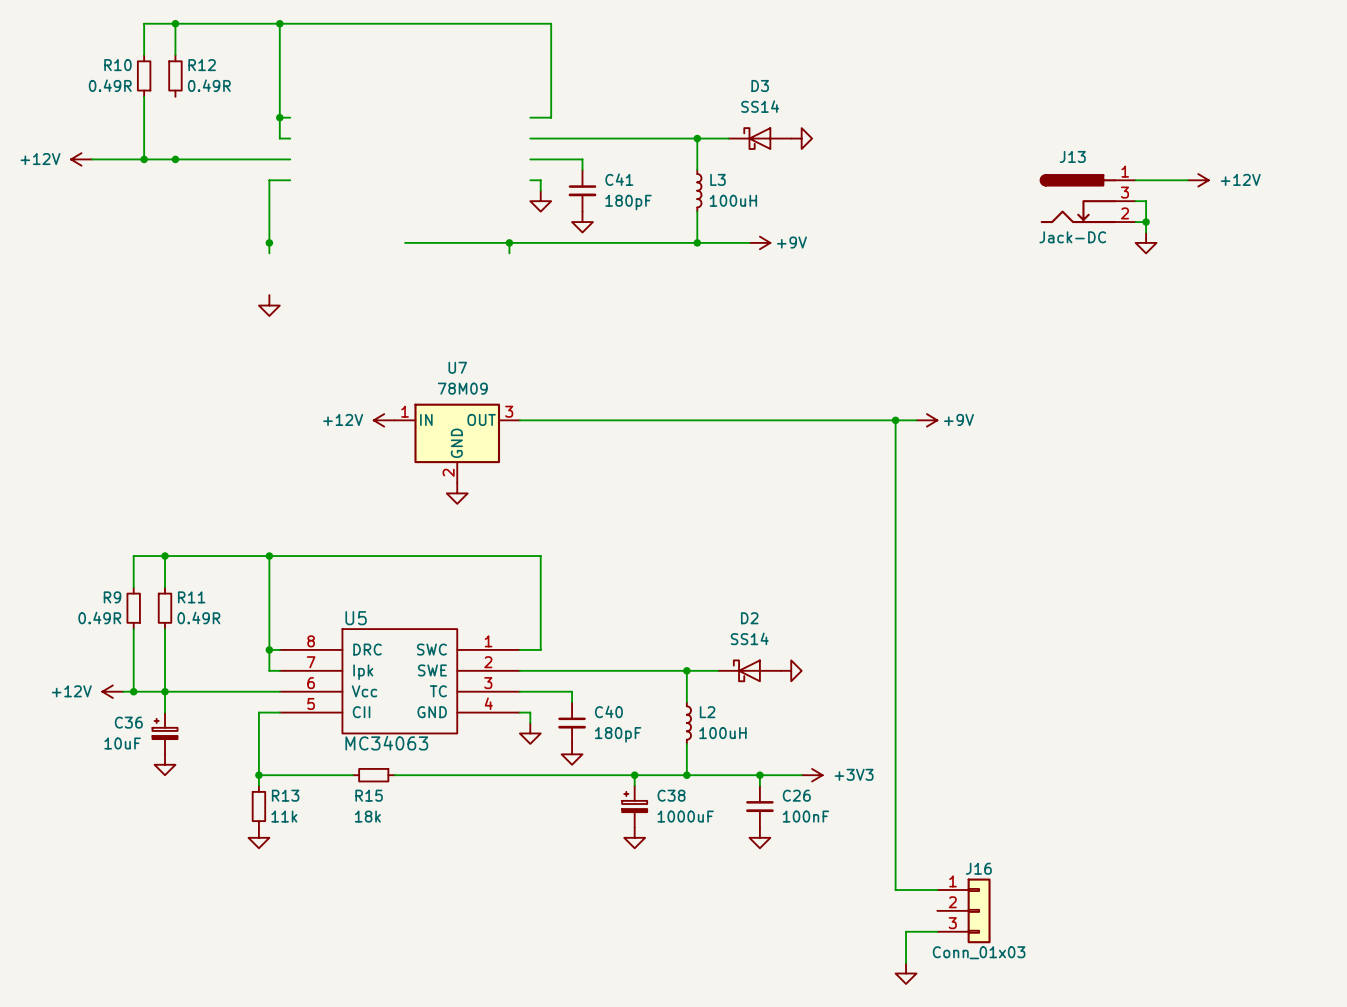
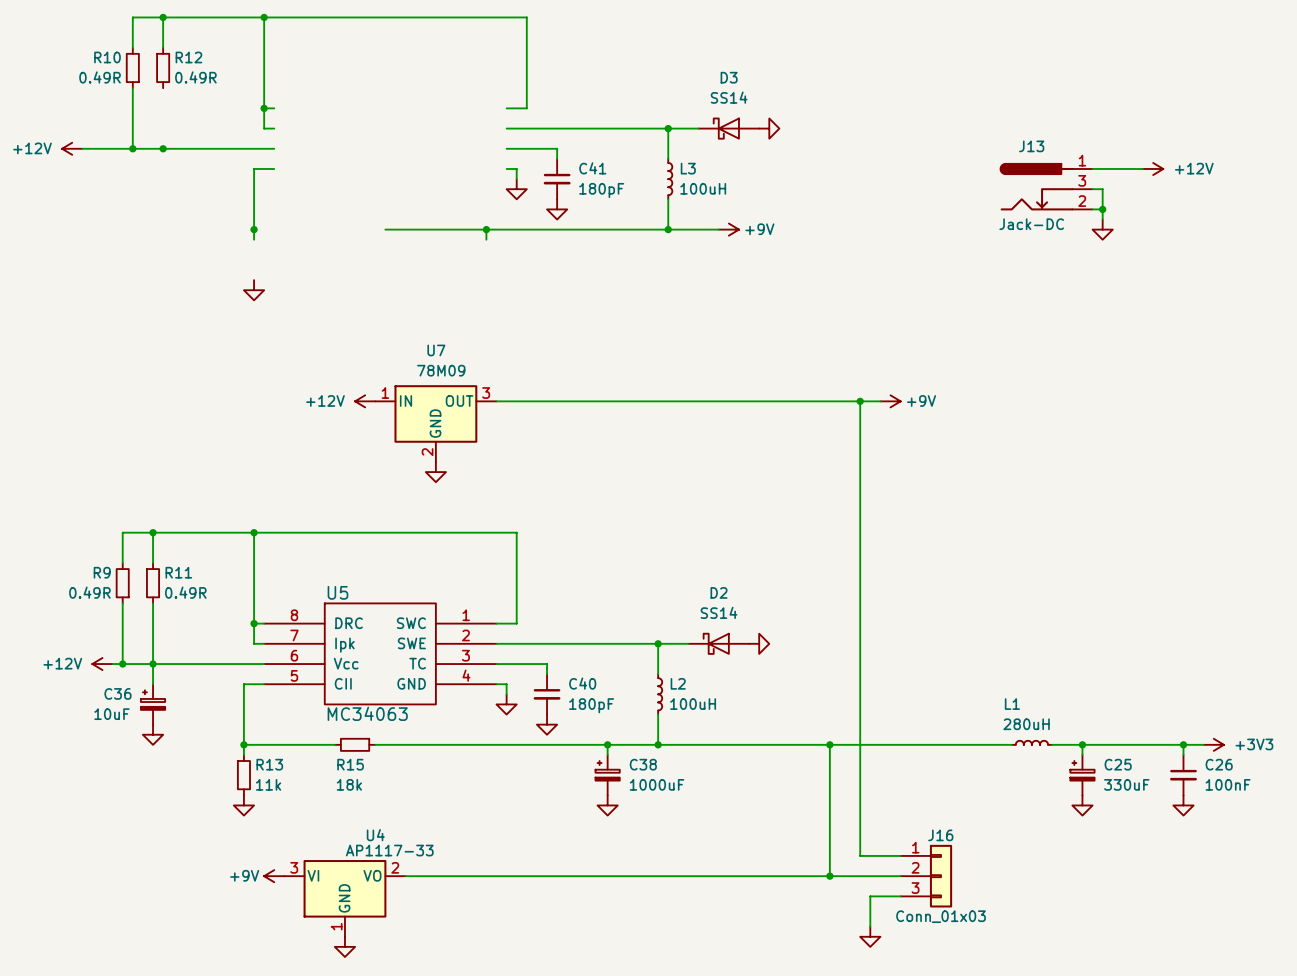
L1: none -> 280uH (1031, 742)
wire: (759, 775) (759, 785) -> none
junction: (759, 775) -> none
wire: none -> (769, 744) (1011, 744)
power symbol: +3V3 (812, 775) -> none
wire: none -> (829, 744) (829, 876)
junction: none -> (829, 744)
wire: none -> (1052, 744) (1203, 744)
wire: none -> (1082, 744) (1082, 754)
junction: none -> (1082, 744)
wire: none -> (1183, 744) (1183, 754)
junction: none -> (1183, 744)
power symbol: none -> +3V3 (1213, 744)
C26 position: (759, 806) -> (1183, 775)
C25: none -> 330uF (1082, 775)
power symbol: (759, 837) -> none
power symbol: none -> (1082, 805)
power symbol: none -> (1183, 805)
power symbol: none -> +9V (274, 876)
wire: none -> (405, 876) (900, 876)
junction: none -> (829, 876)
U4: none -> AP1117-33 (344, 898)
power symbol: none -> (344, 946)

